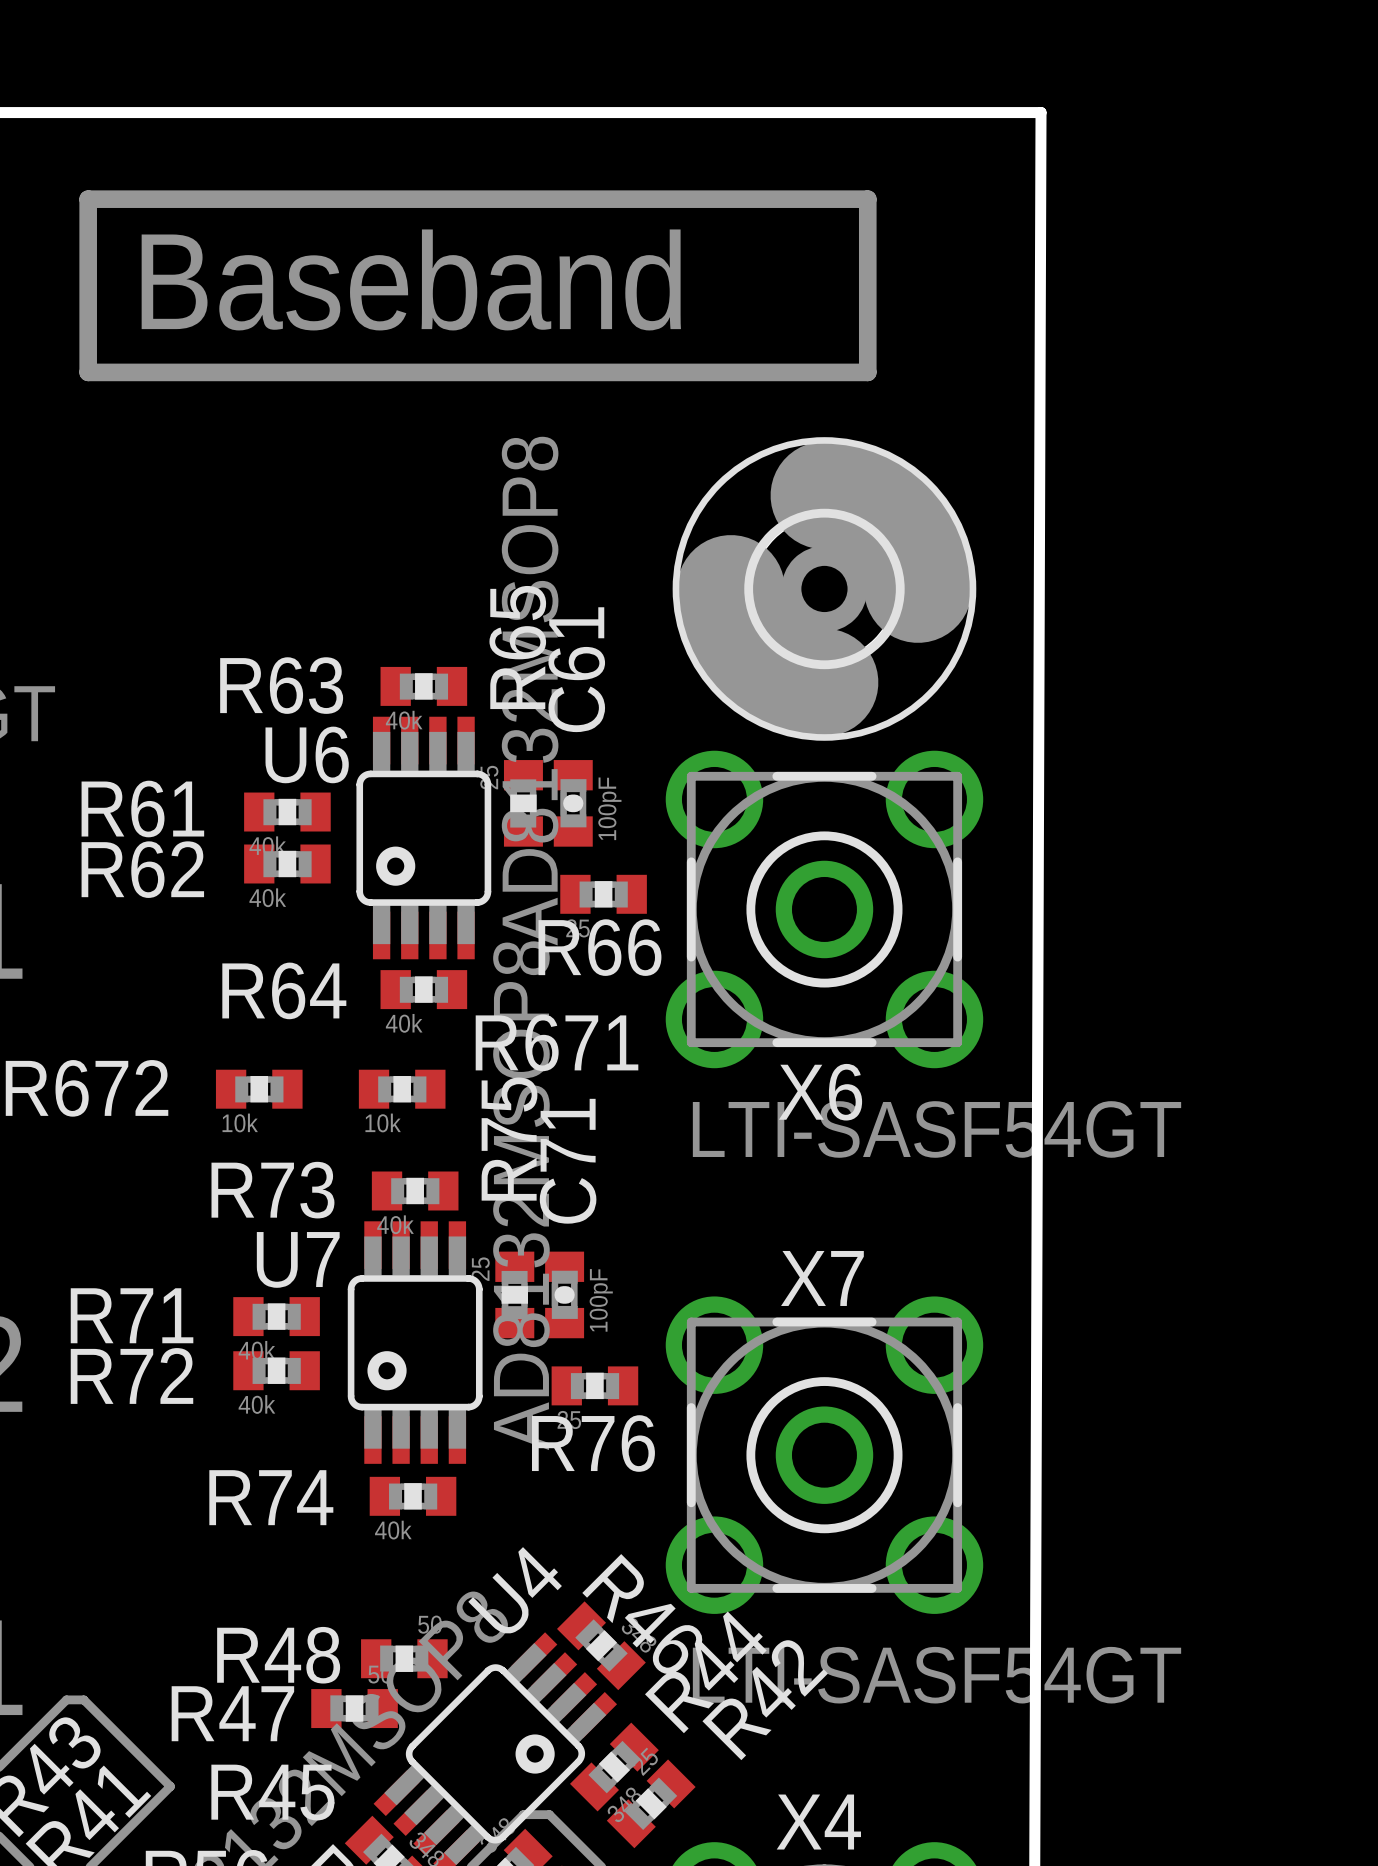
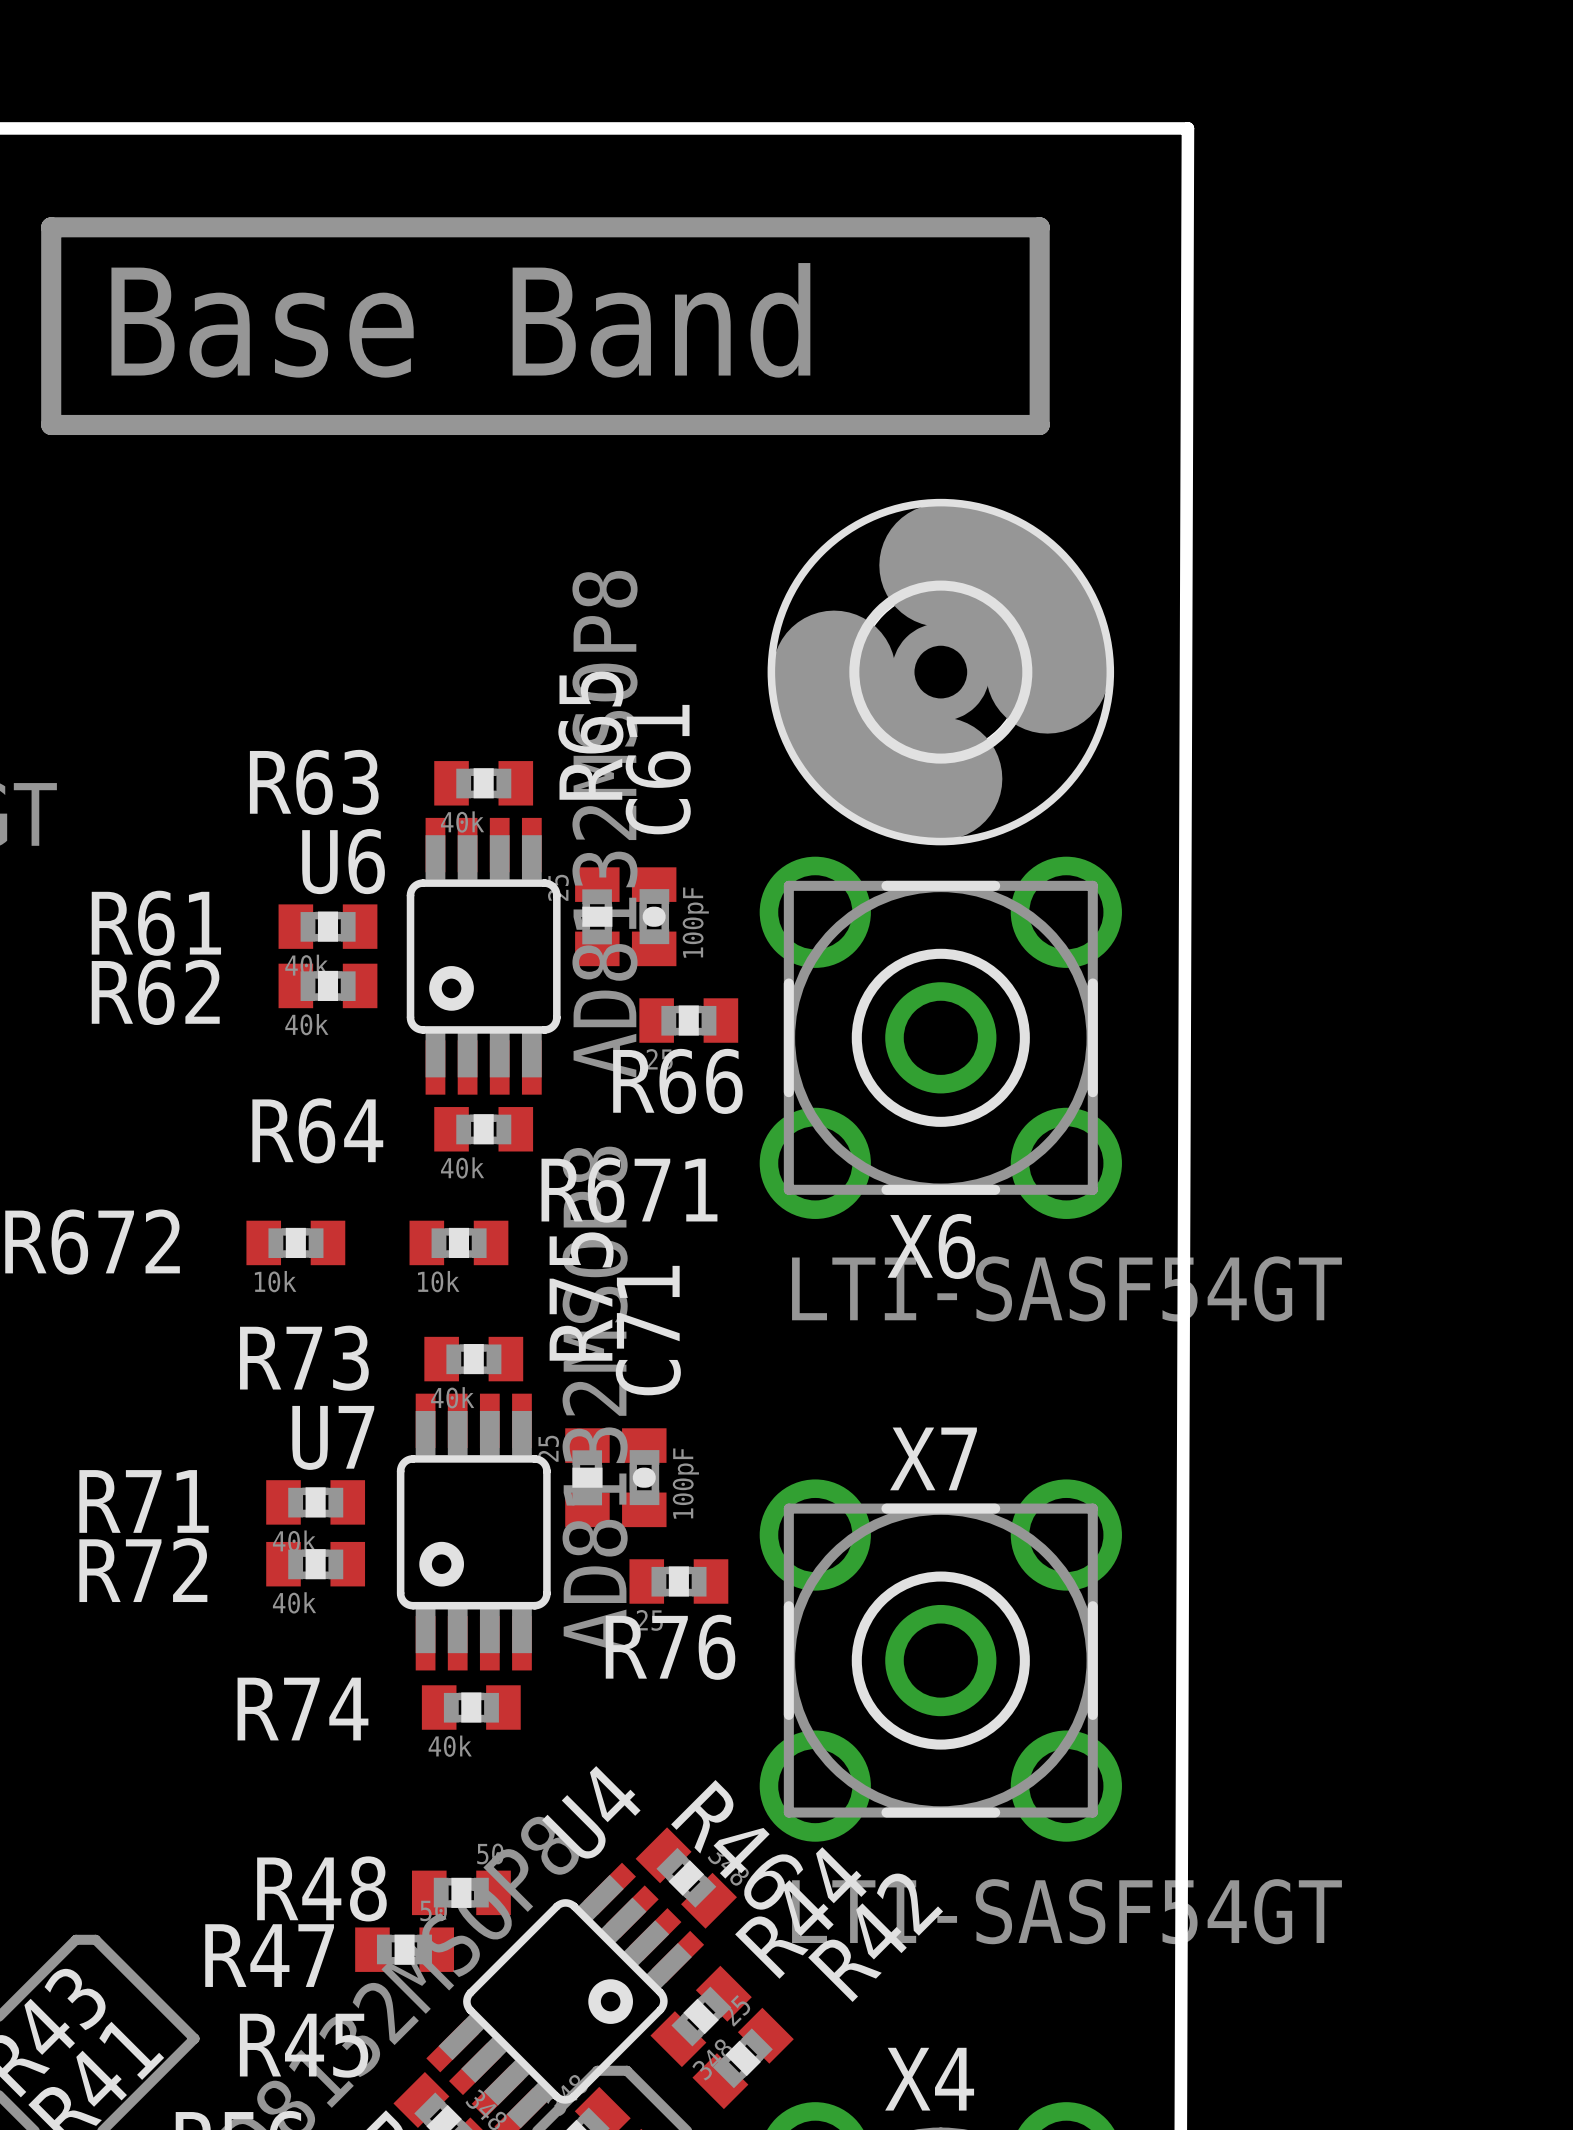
line: (88, 199) (88, 372) -> (100, 227) (51, 227) (51, 424) (100, 424)
line: (867, 199) (867, 372) -> (990, 227) (1039, 227) (1039, 424) (990, 424)
text: Baseband (411, 279) -> Base Band (460, 320)

